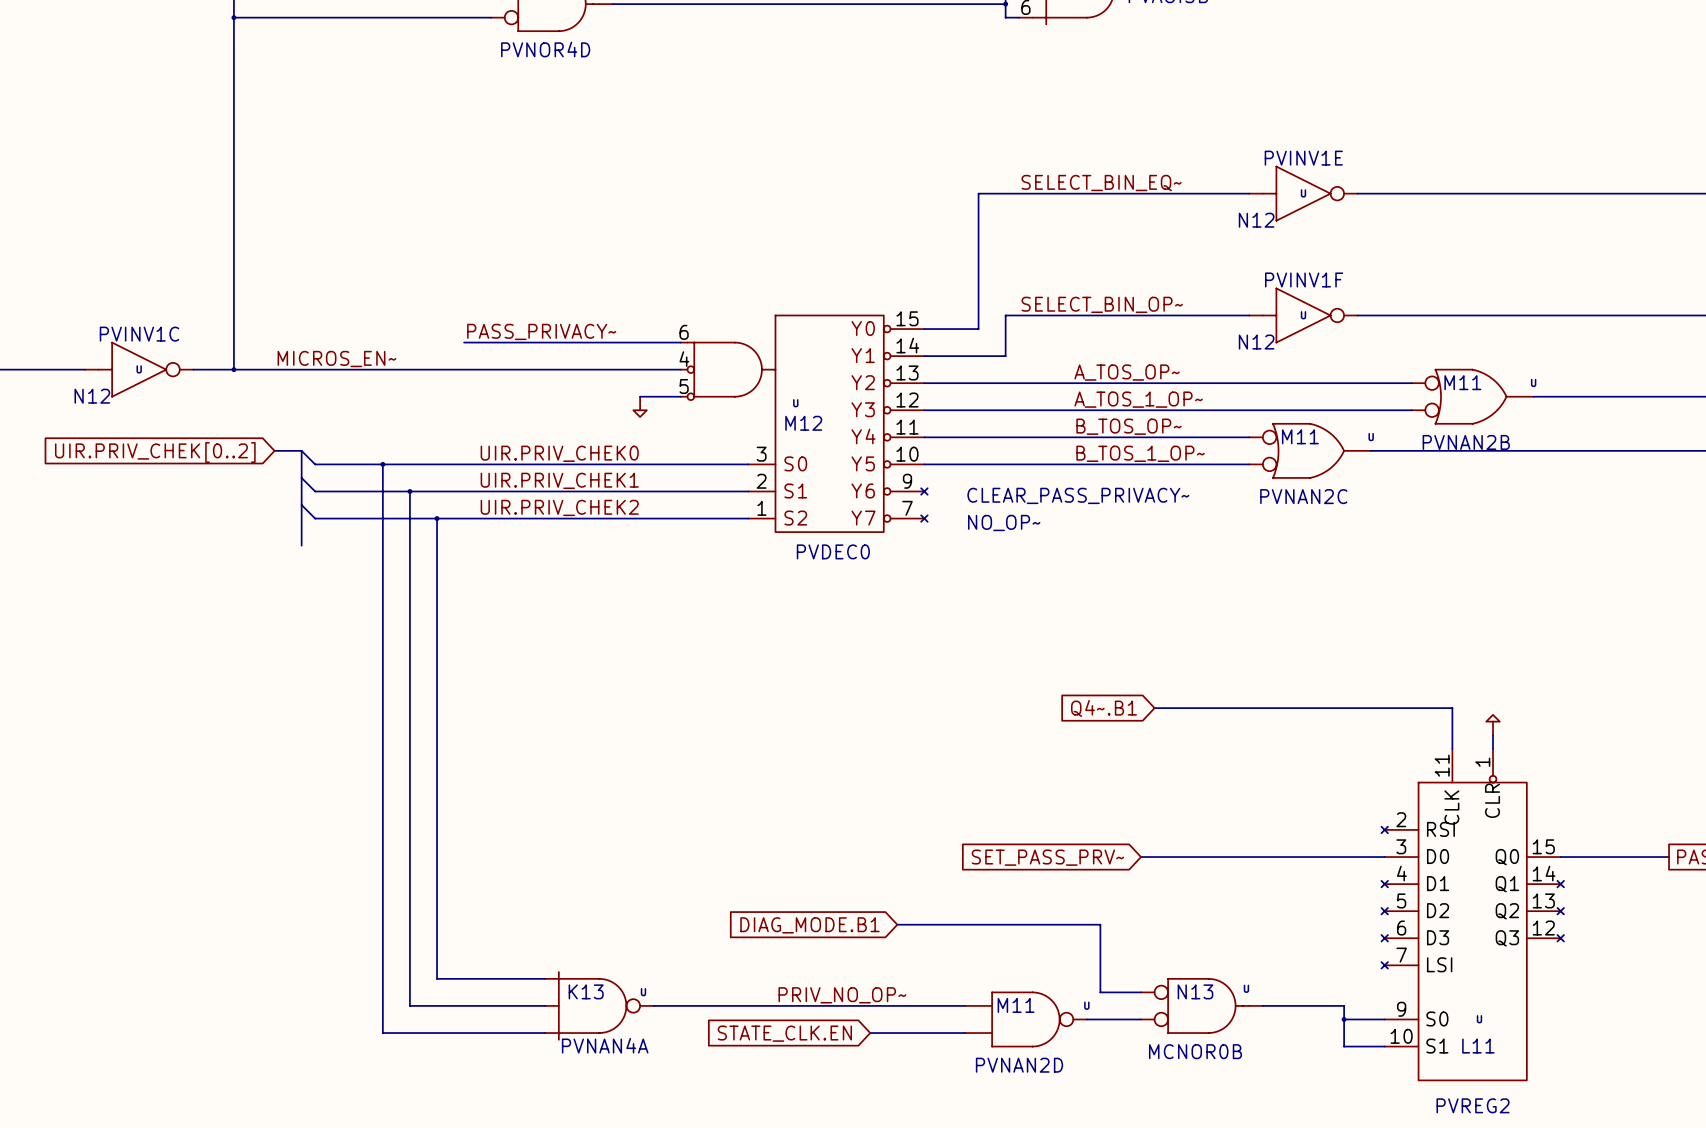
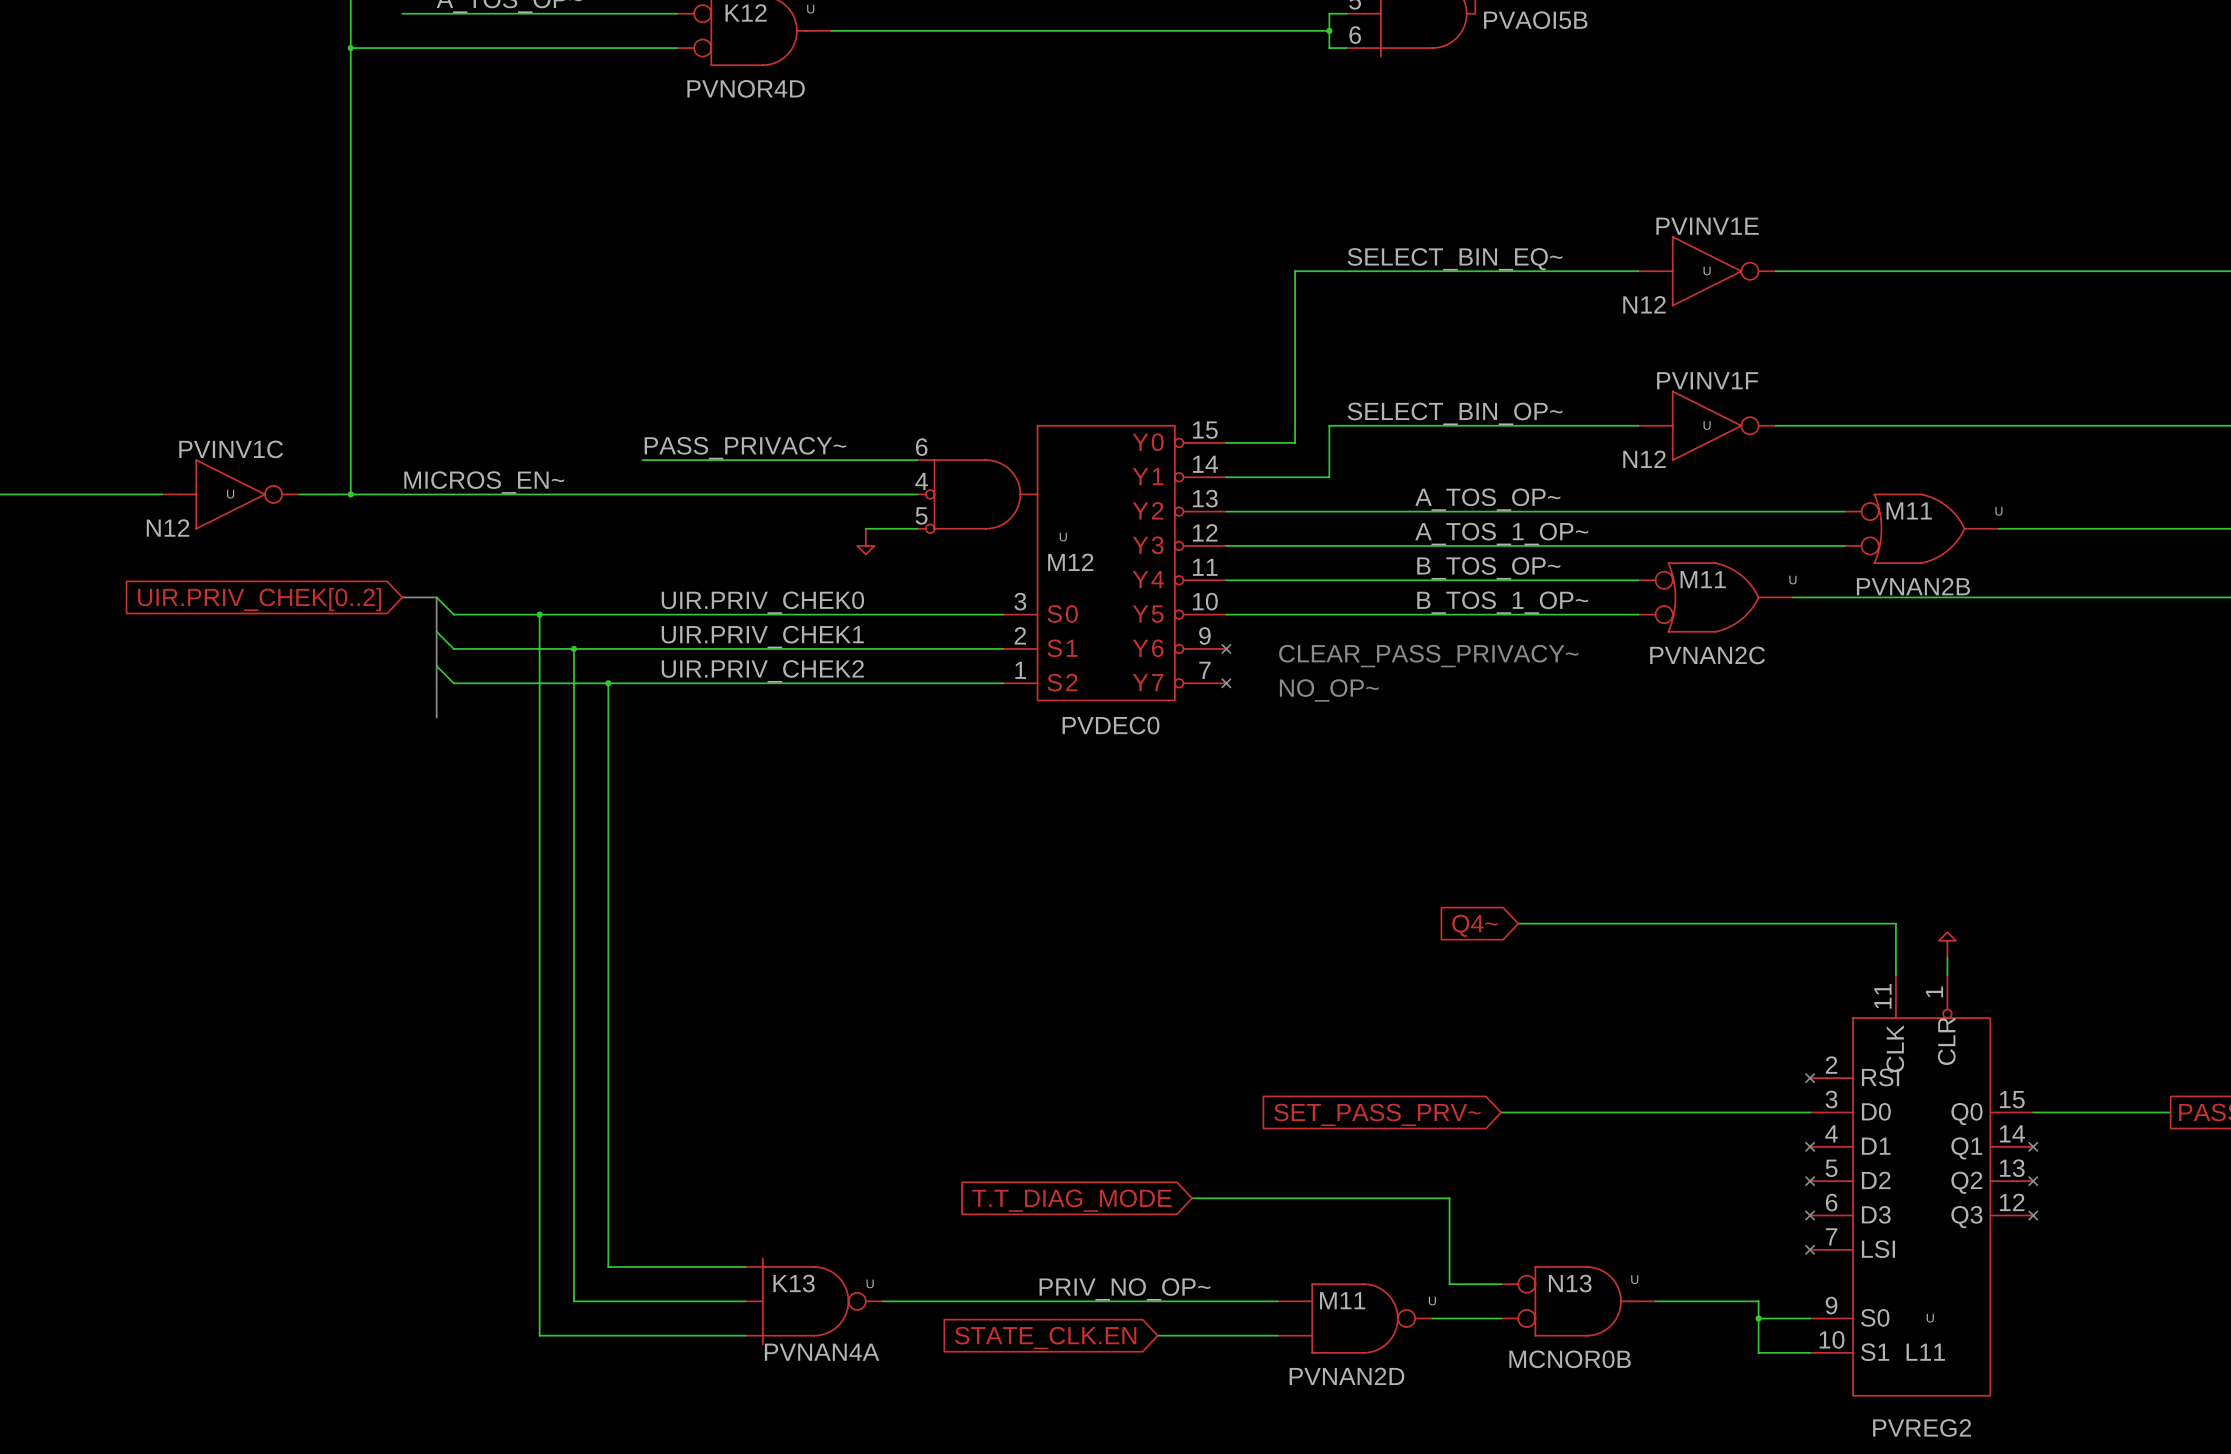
global label: Q4~.B1 (1103, 708) -> Q4~ (1475, 925)
global label: DIAG_MODE.B1 (810, 925) -> T.T_DIAG_MODE (1071, 1200)

